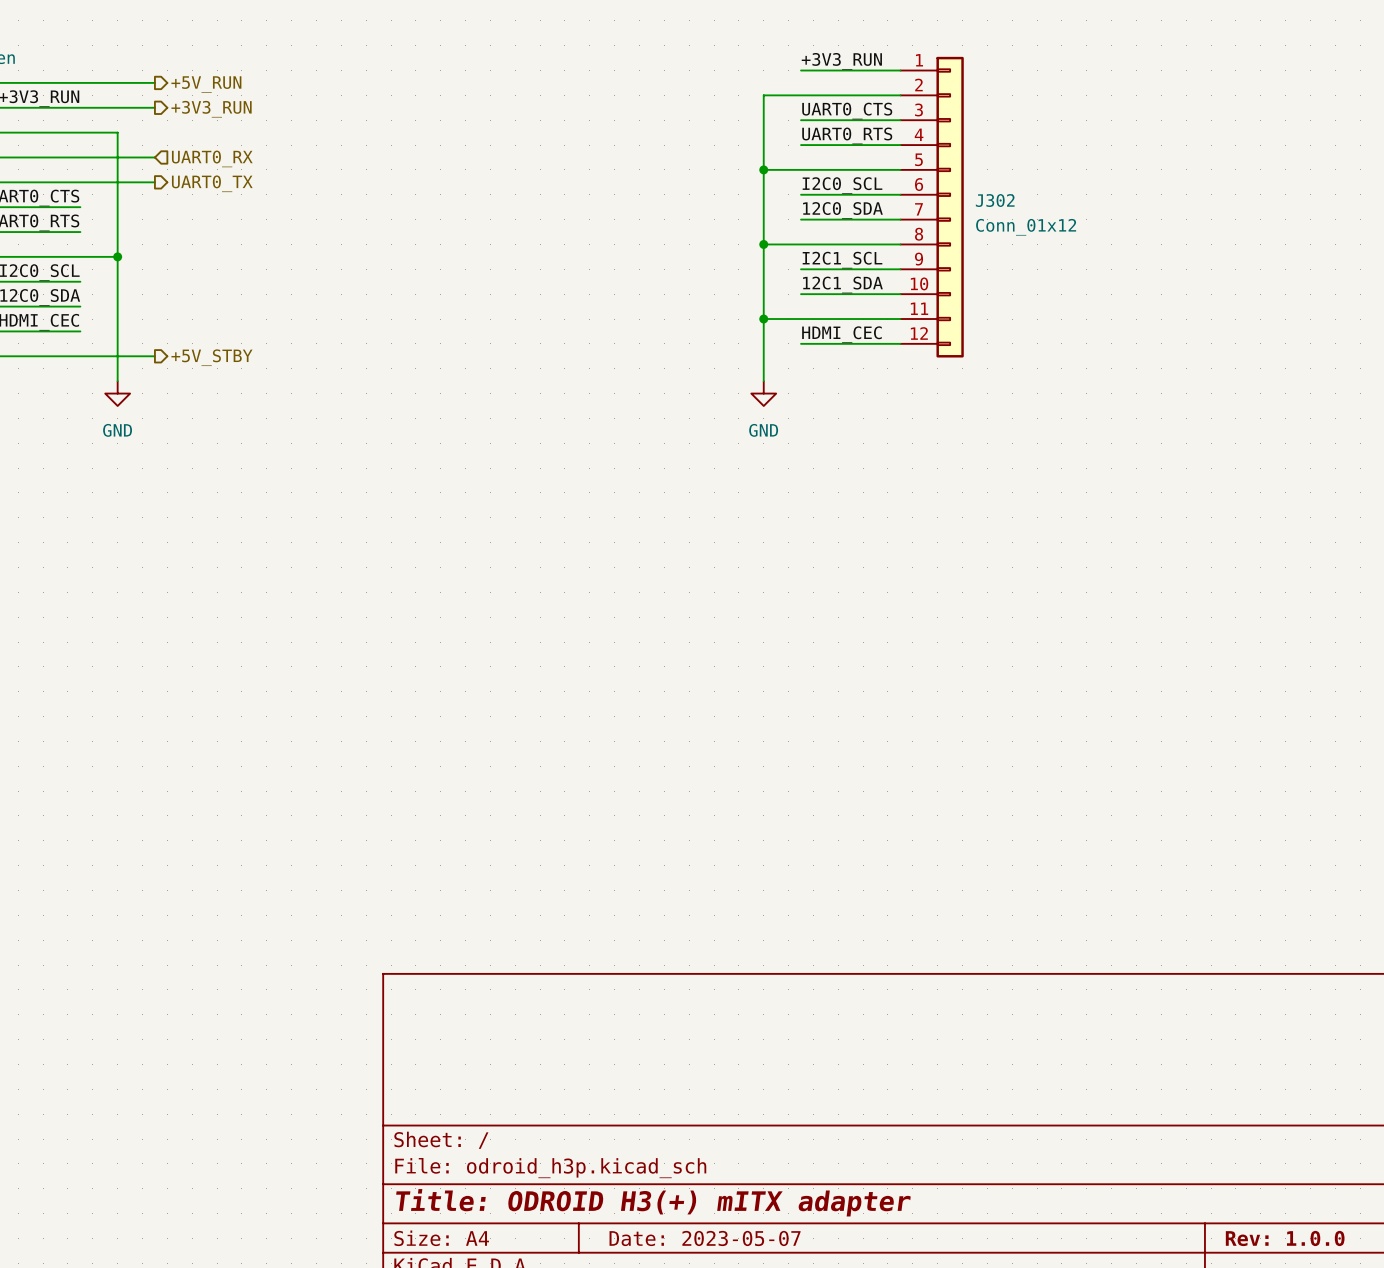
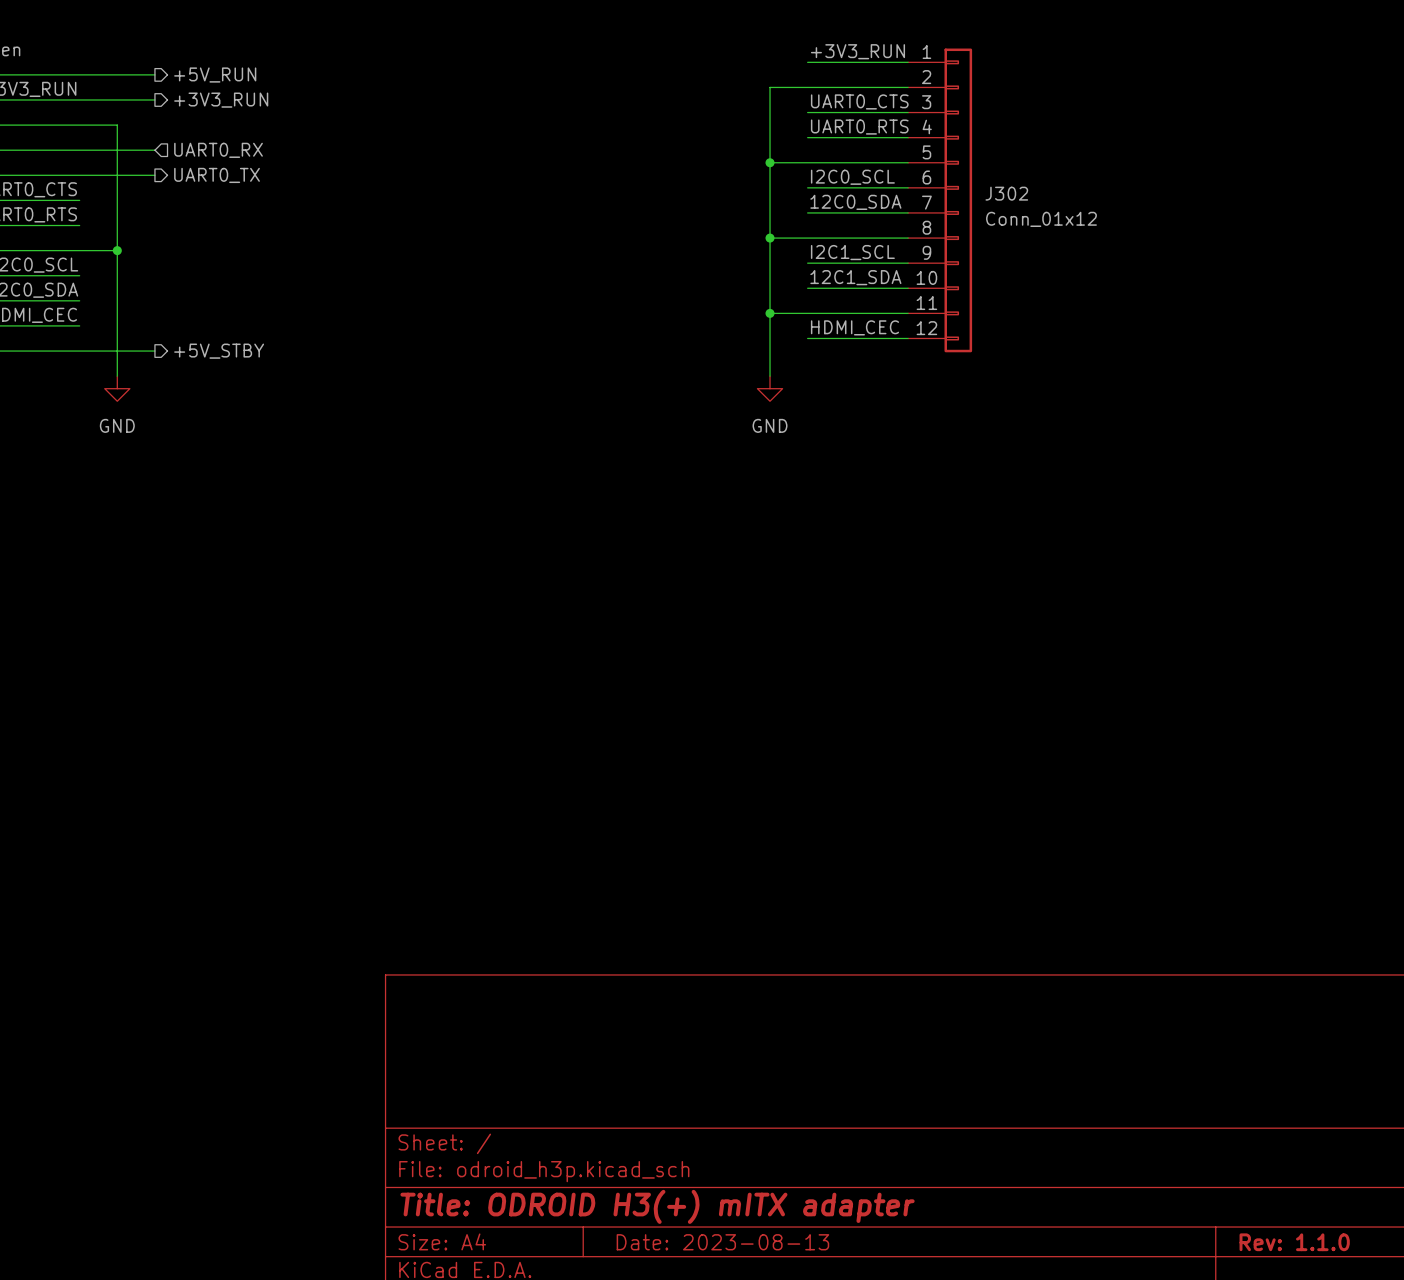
title block: Date: 2023-05-07 (705, 1238) -> Date: 2023-08-13 (722, 1242)
title block: Rev: 1.0.0 (1285, 1238) -> Rev: 1.1.0 (1294, 1242)

